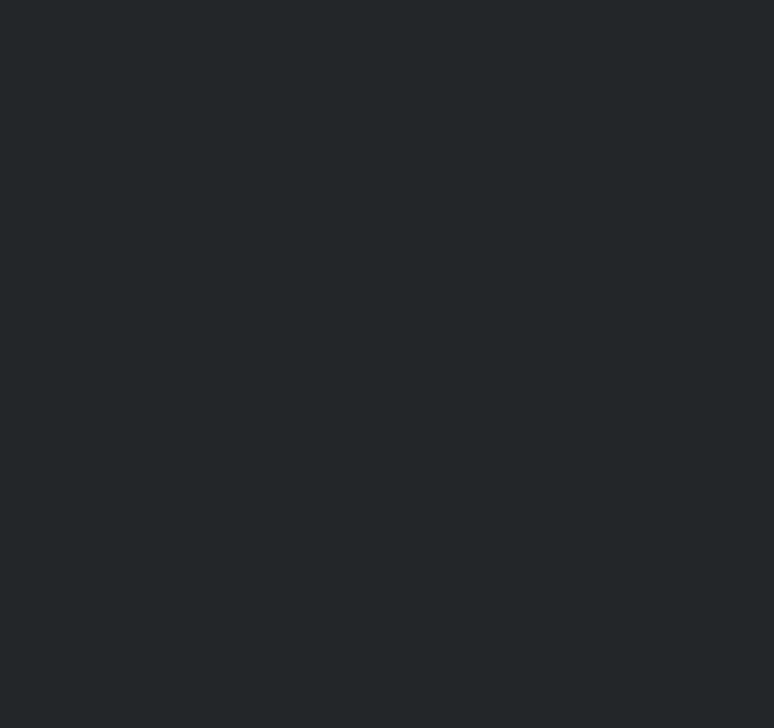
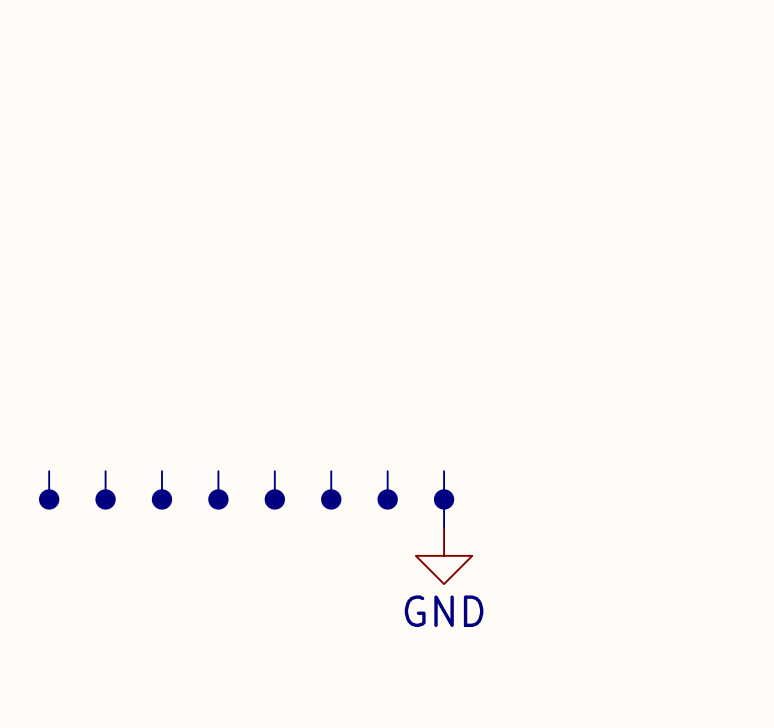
wire: none -> (49, 471) (49, 499)
wire: none -> (105, 471) (105, 499)
wire: none -> (161, 471) (161, 499)
wire: none -> (218, 471) (218, 499)
wire: none -> (274, 471) (274, 499)
wire: none -> (331, 471) (331, 499)
wire: none -> (387, 471) (387, 499)
wire: none -> (444, 471) (444, 527)
junction: none -> (49, 499)
junction: none -> (105, 499)
junction: none -> (161, 499)
junction: none -> (218, 499)
junction: none -> (274, 499)
junction: none -> (331, 499)
junction: none -> (387, 499)
junction: none -> (444, 499)
power symbol: none -> GND (444, 555)

